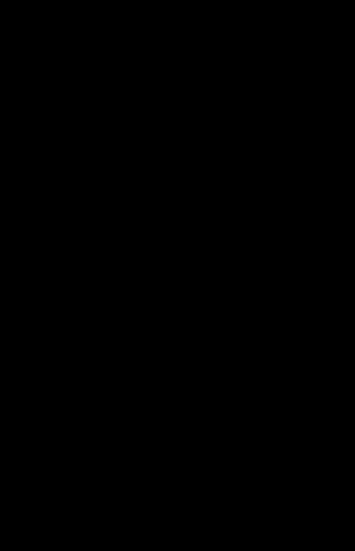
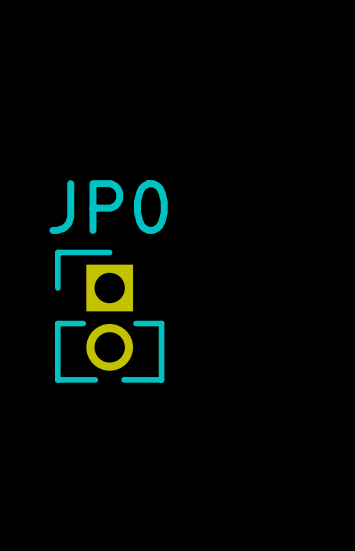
JP0: none -> (109, 316)

